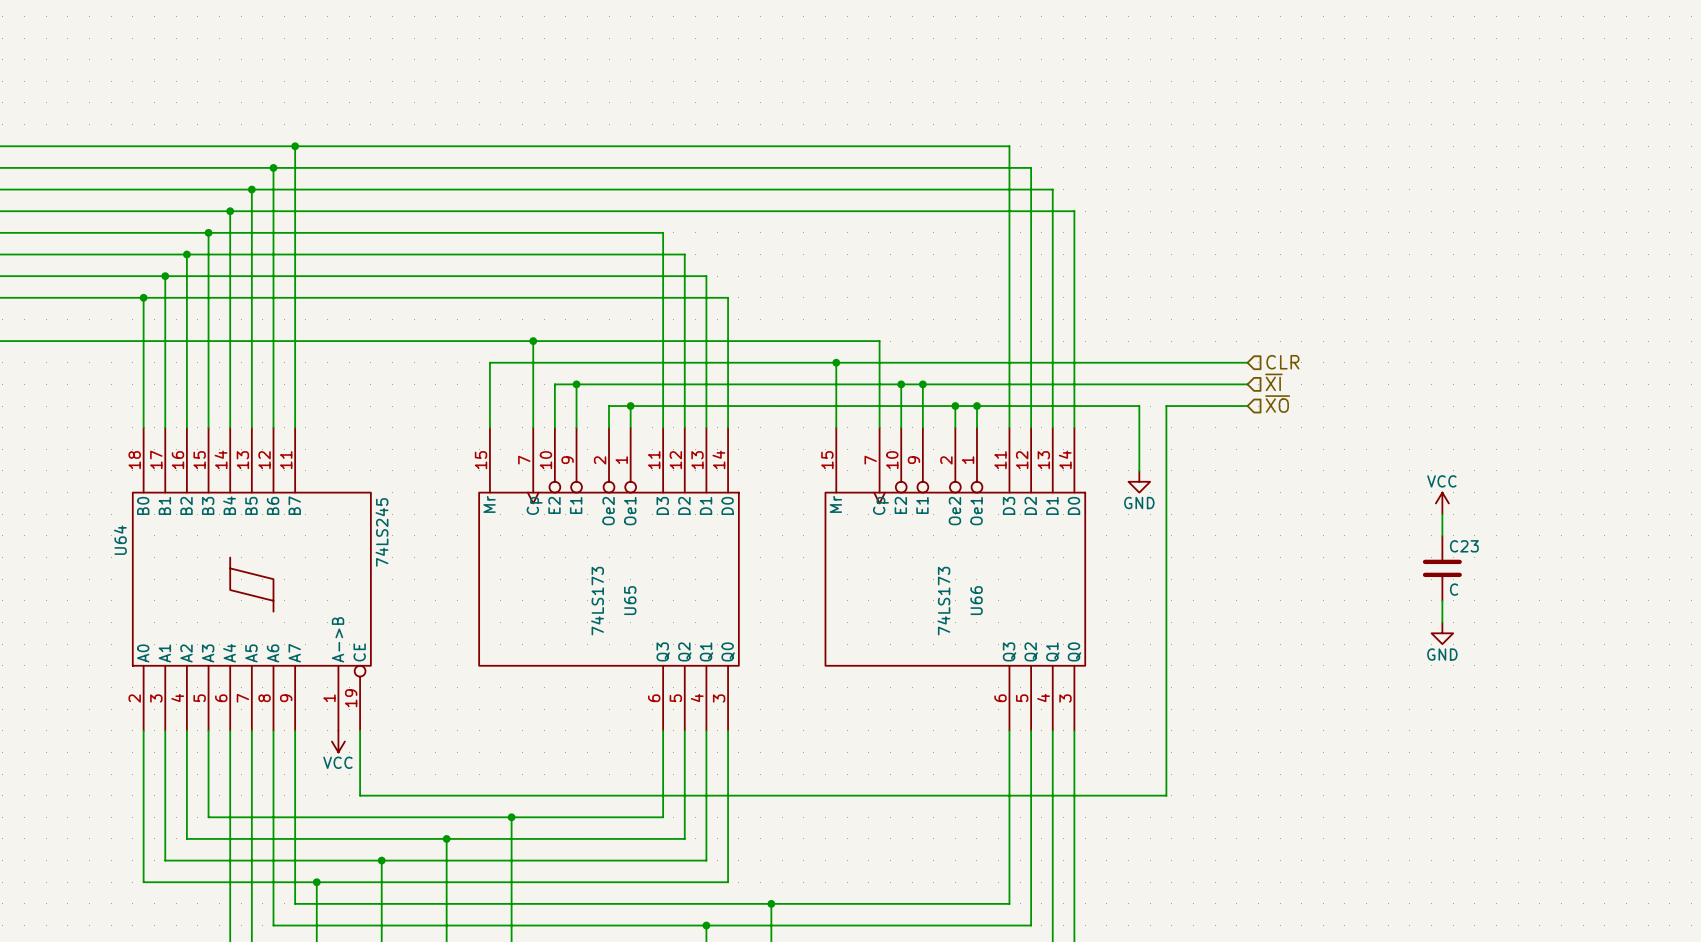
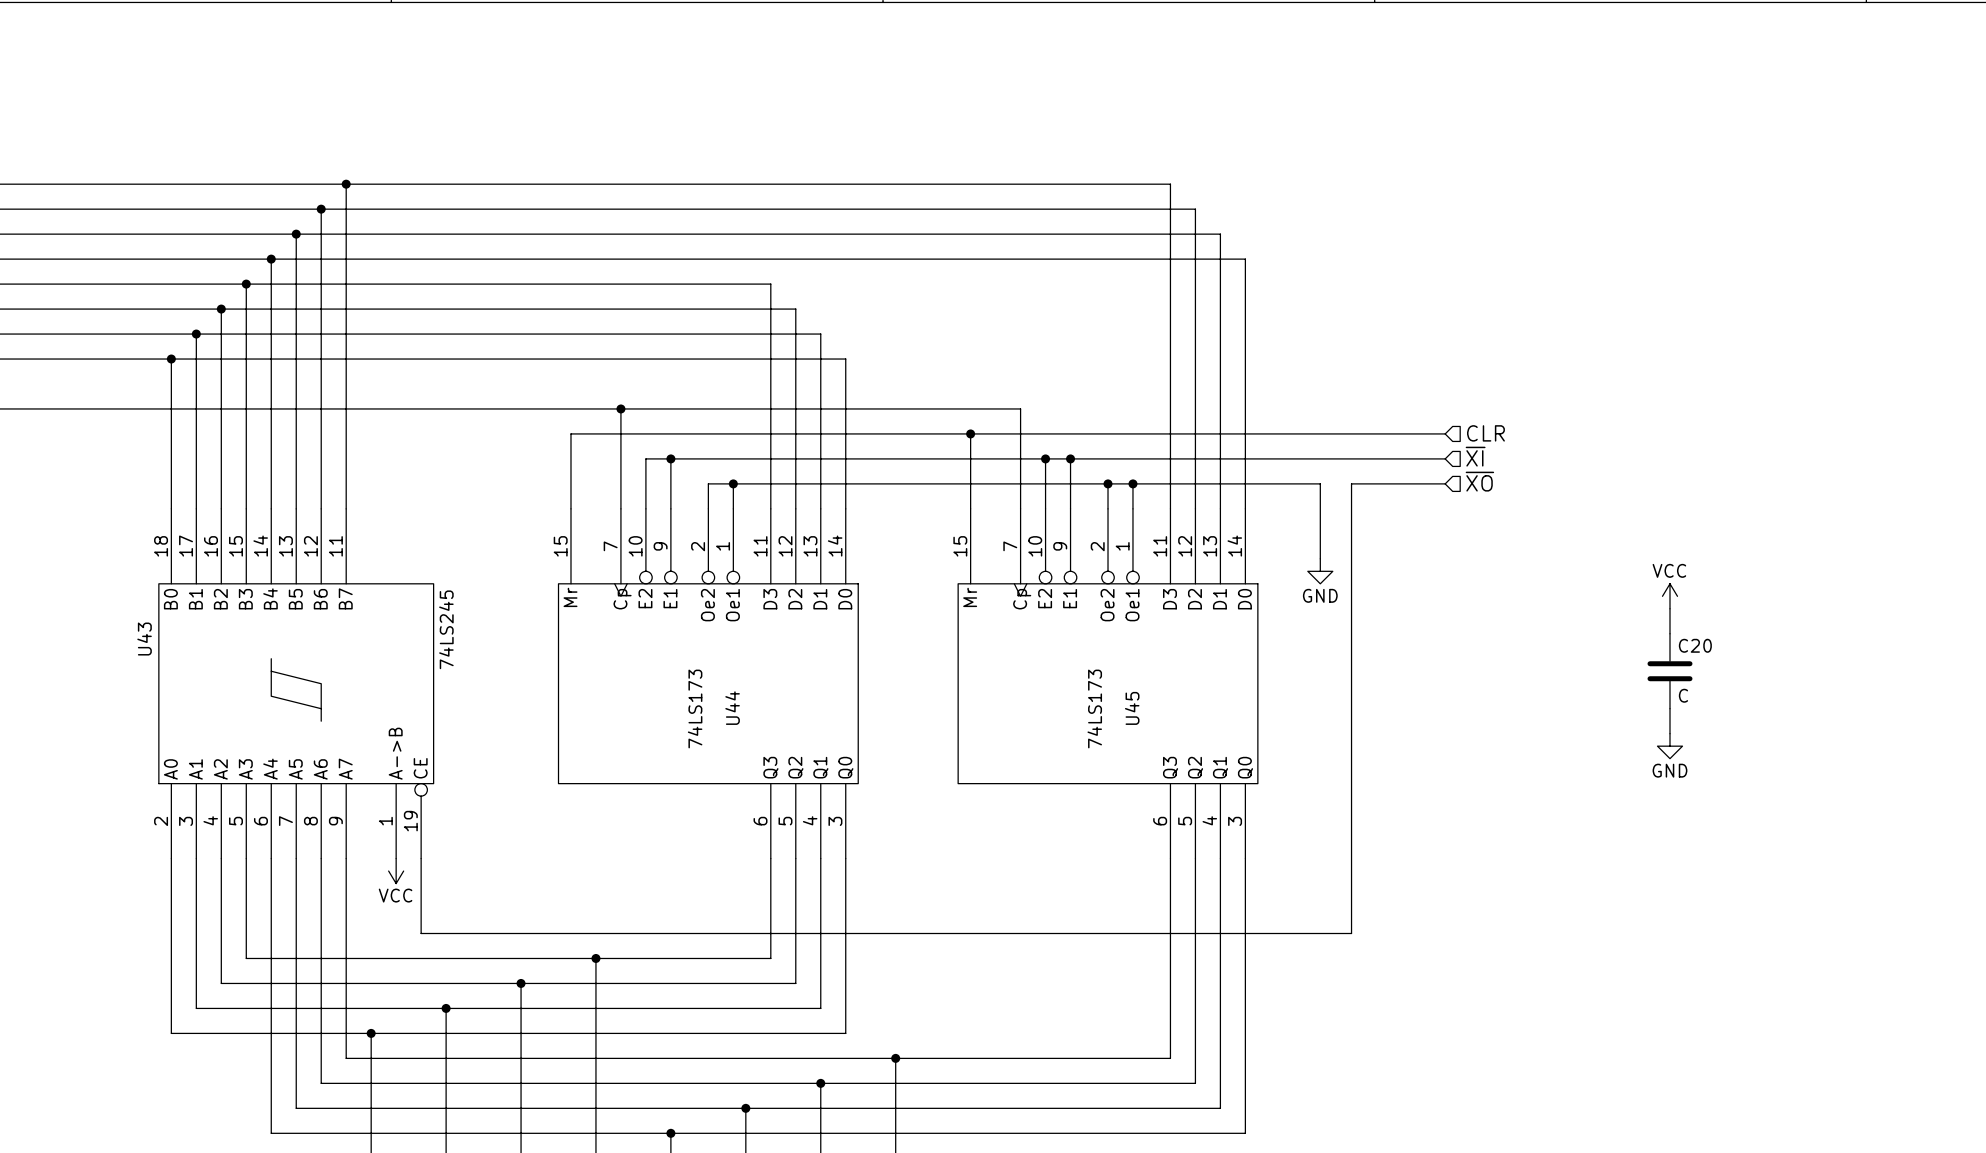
U64 name: U64 (120, 540) -> U43 (144, 639)
C23 name: C23 (1464, 546) -> C20 (1695, 645)
U65 name: U65 (630, 600) -> U44 (732, 708)
U66 name: U66 (976, 600) -> U45 (1132, 708)

